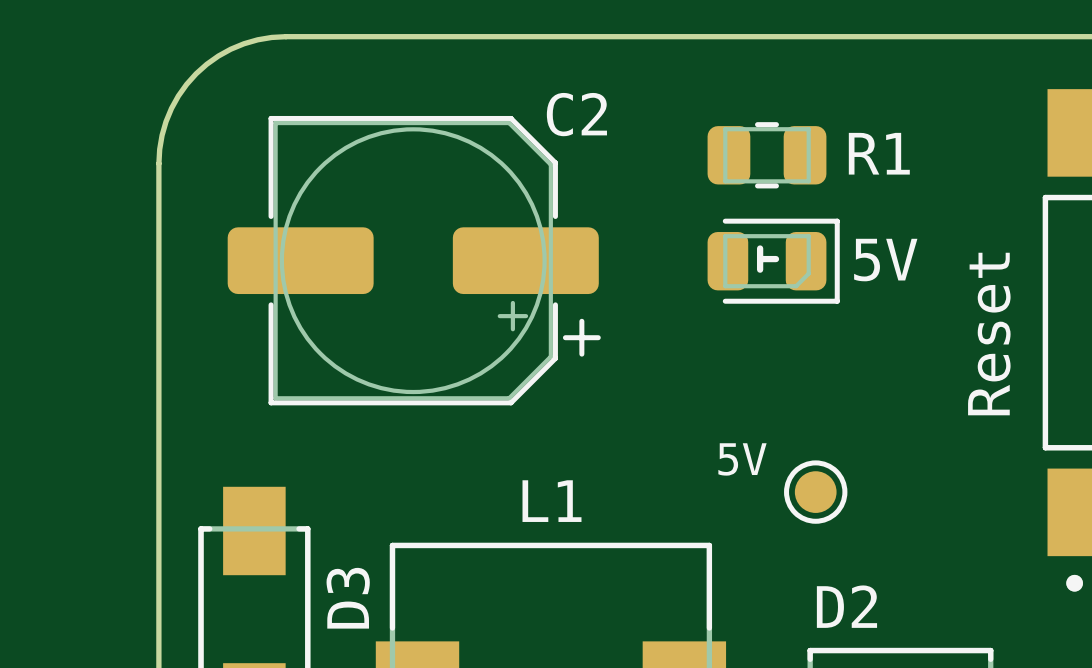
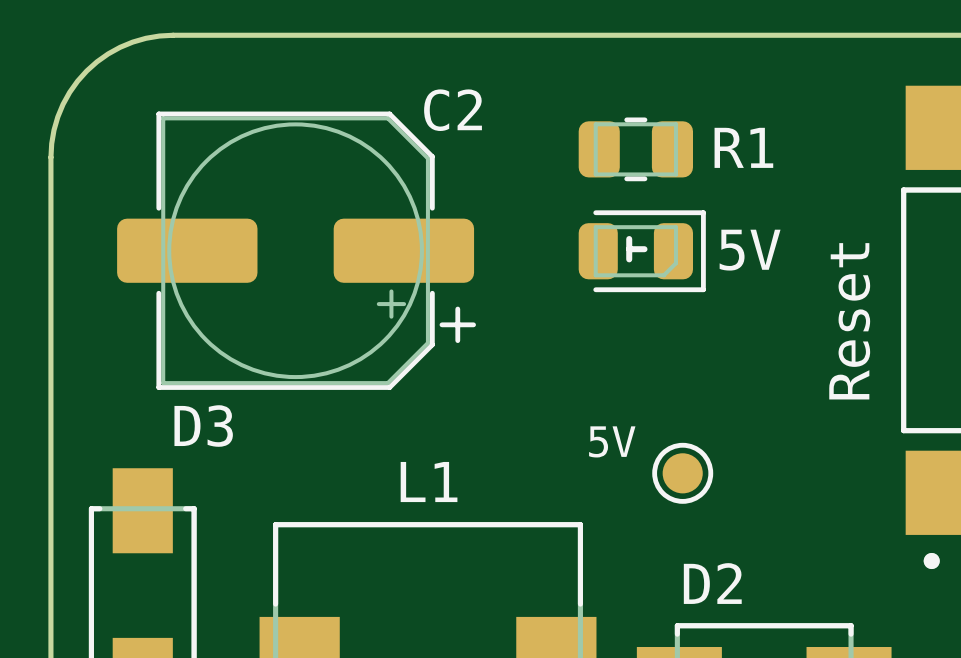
D3 name rotation: 0° (348, 598) -> 90° clockwise (203, 426)
D3 name position: D3 (348, 598) -> D3 (203, 426)

